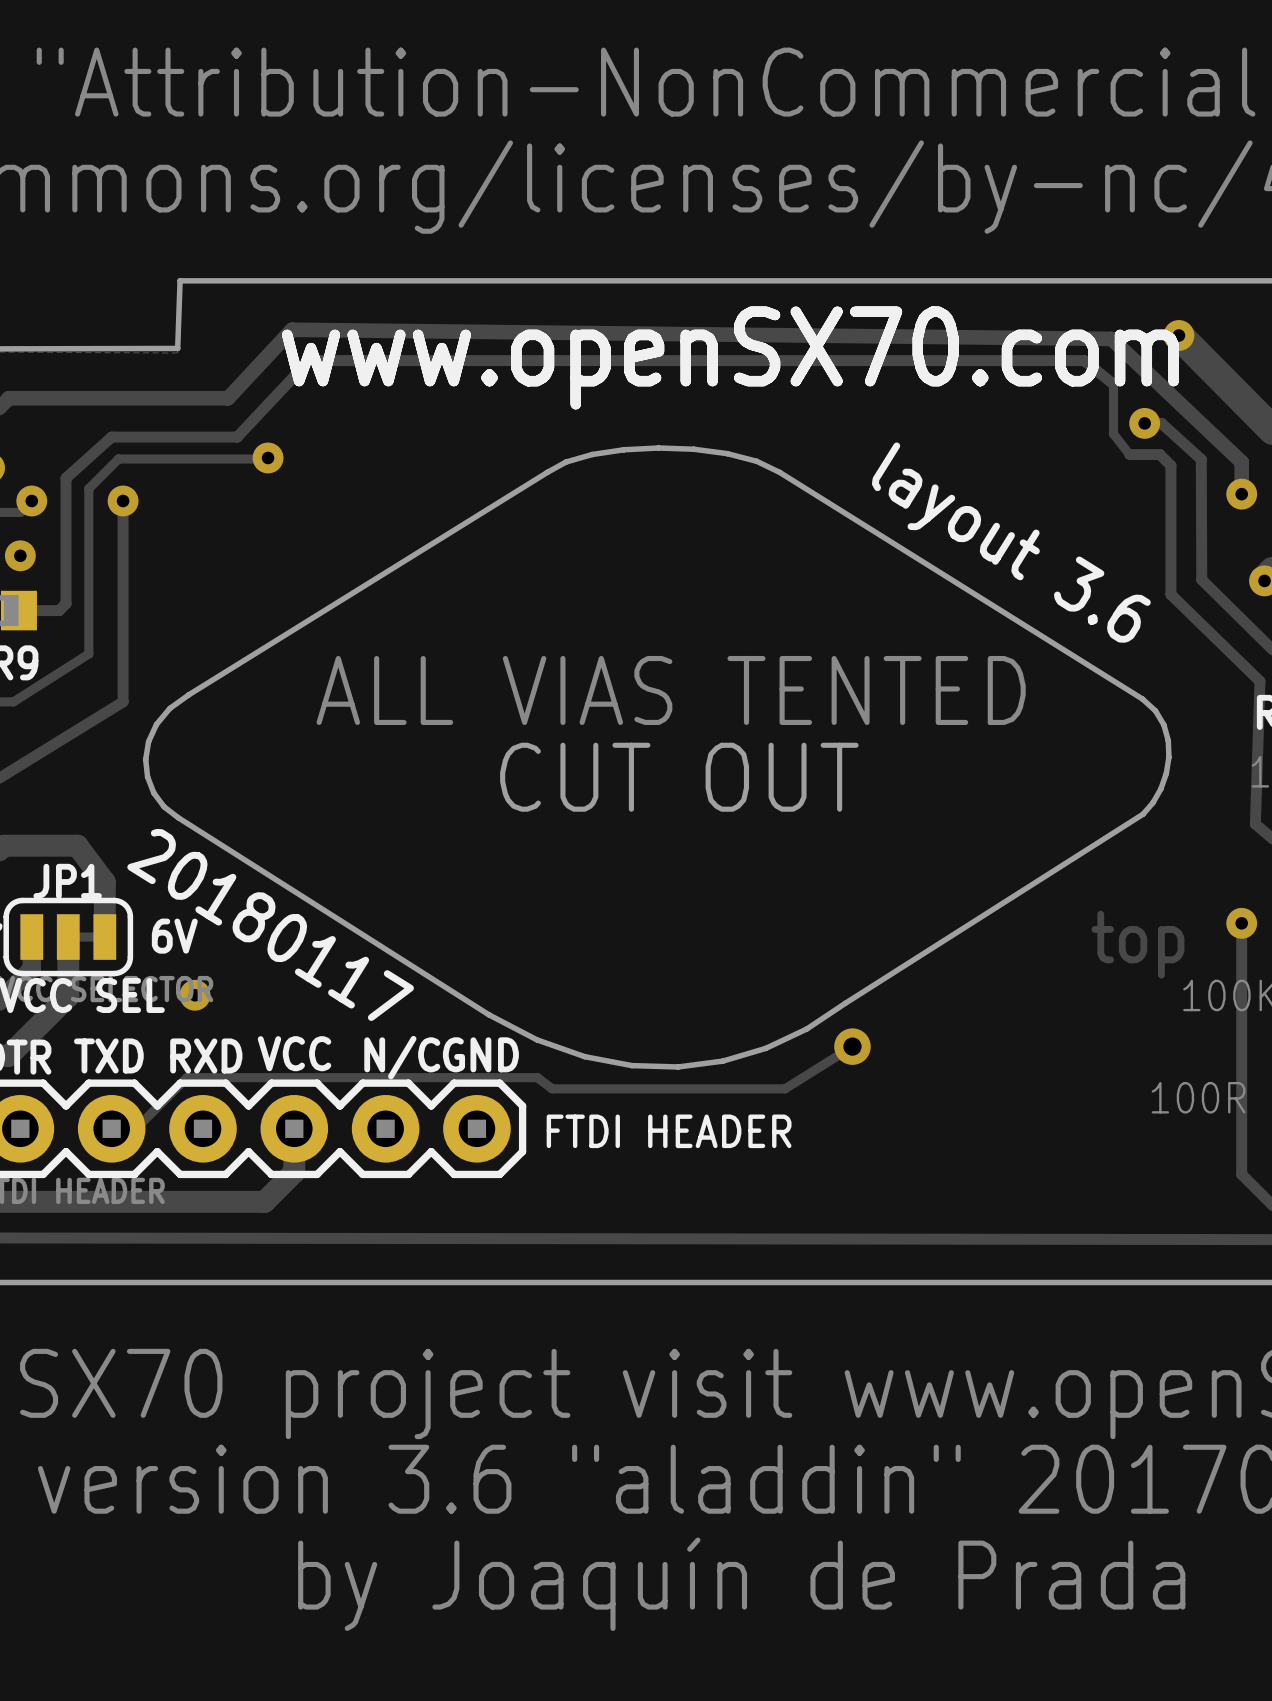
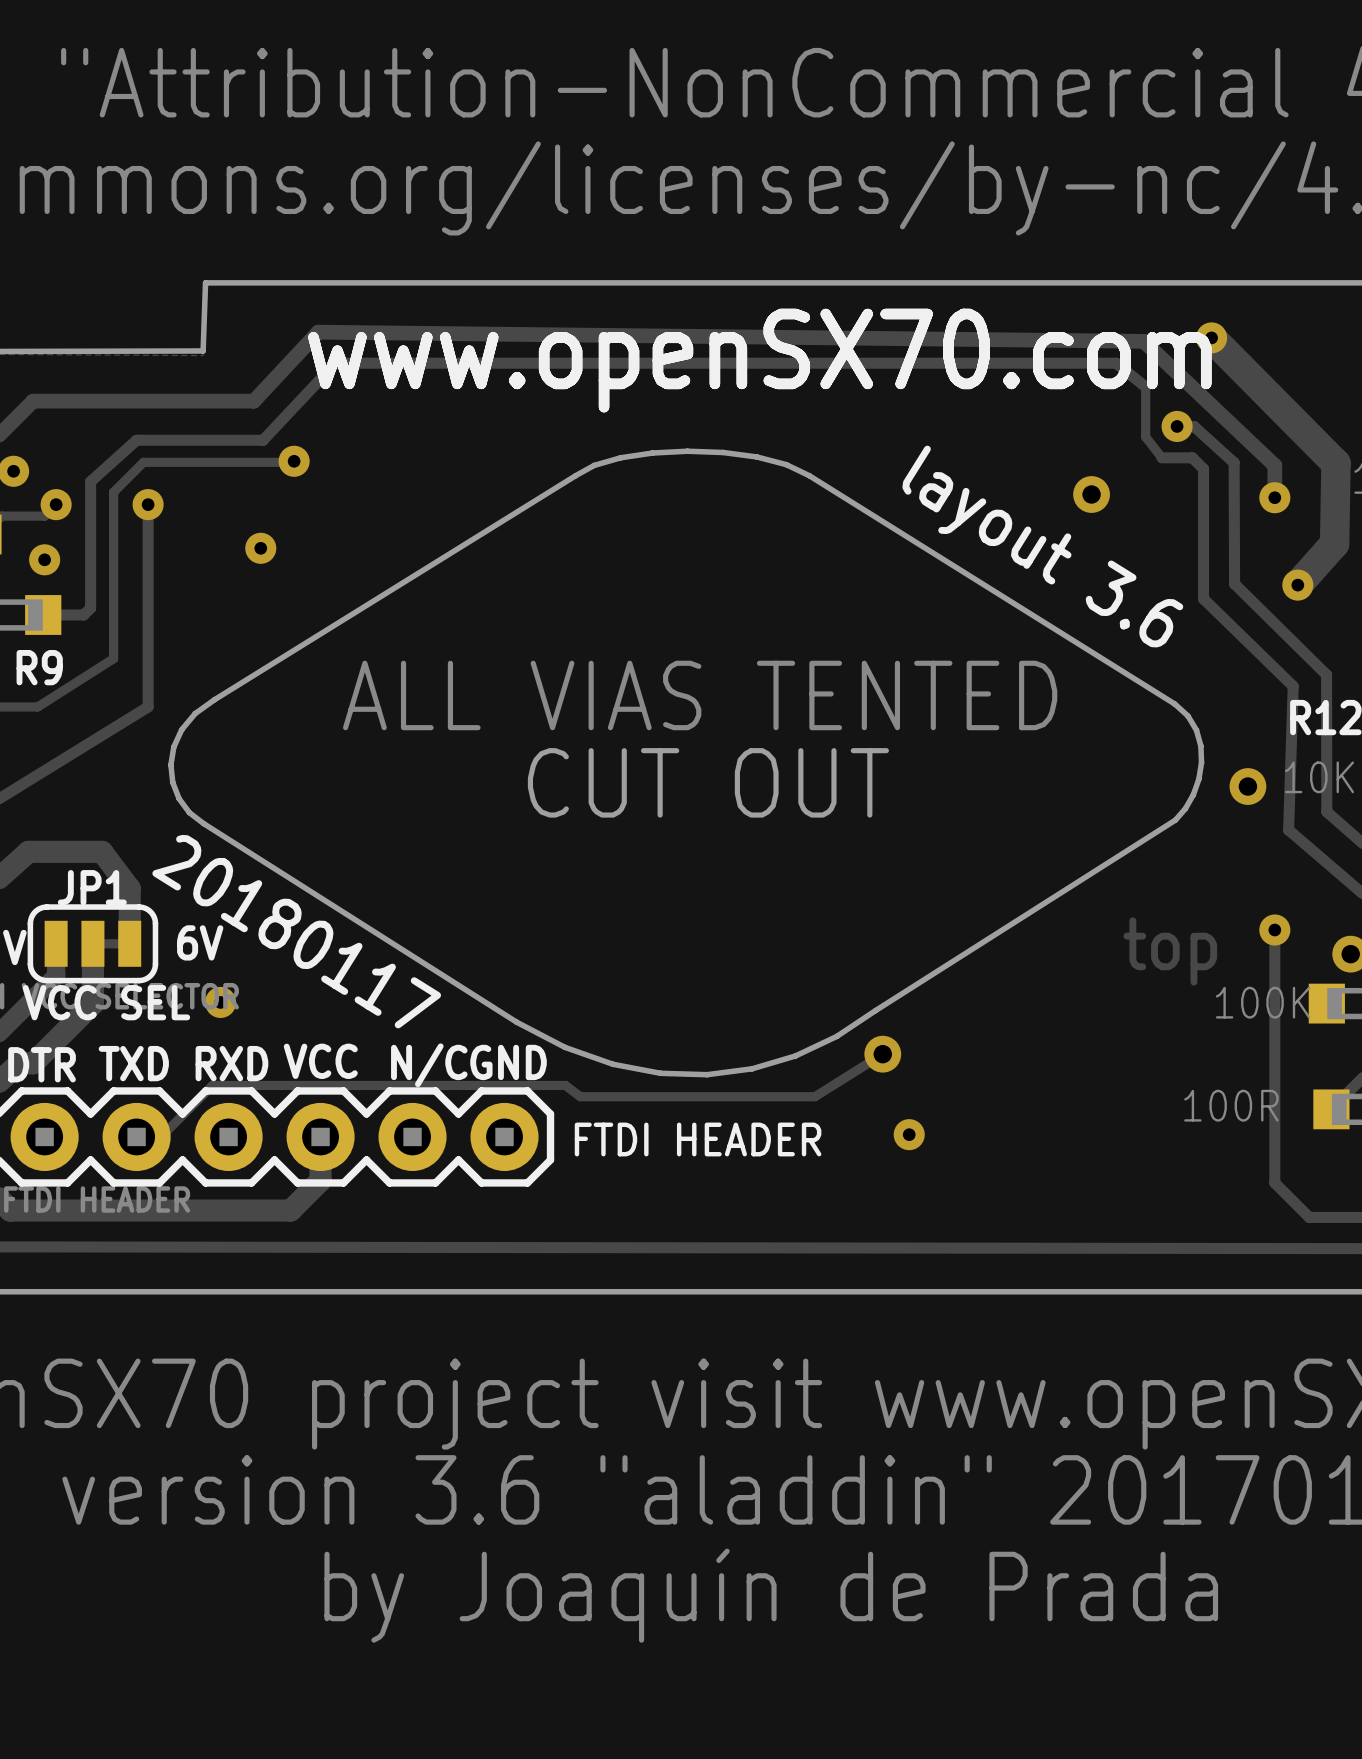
via: none -> (1091, 494)
via: none -> (260, 548)
via: none -> (1247, 786)
via: none -> (909, 1134)

